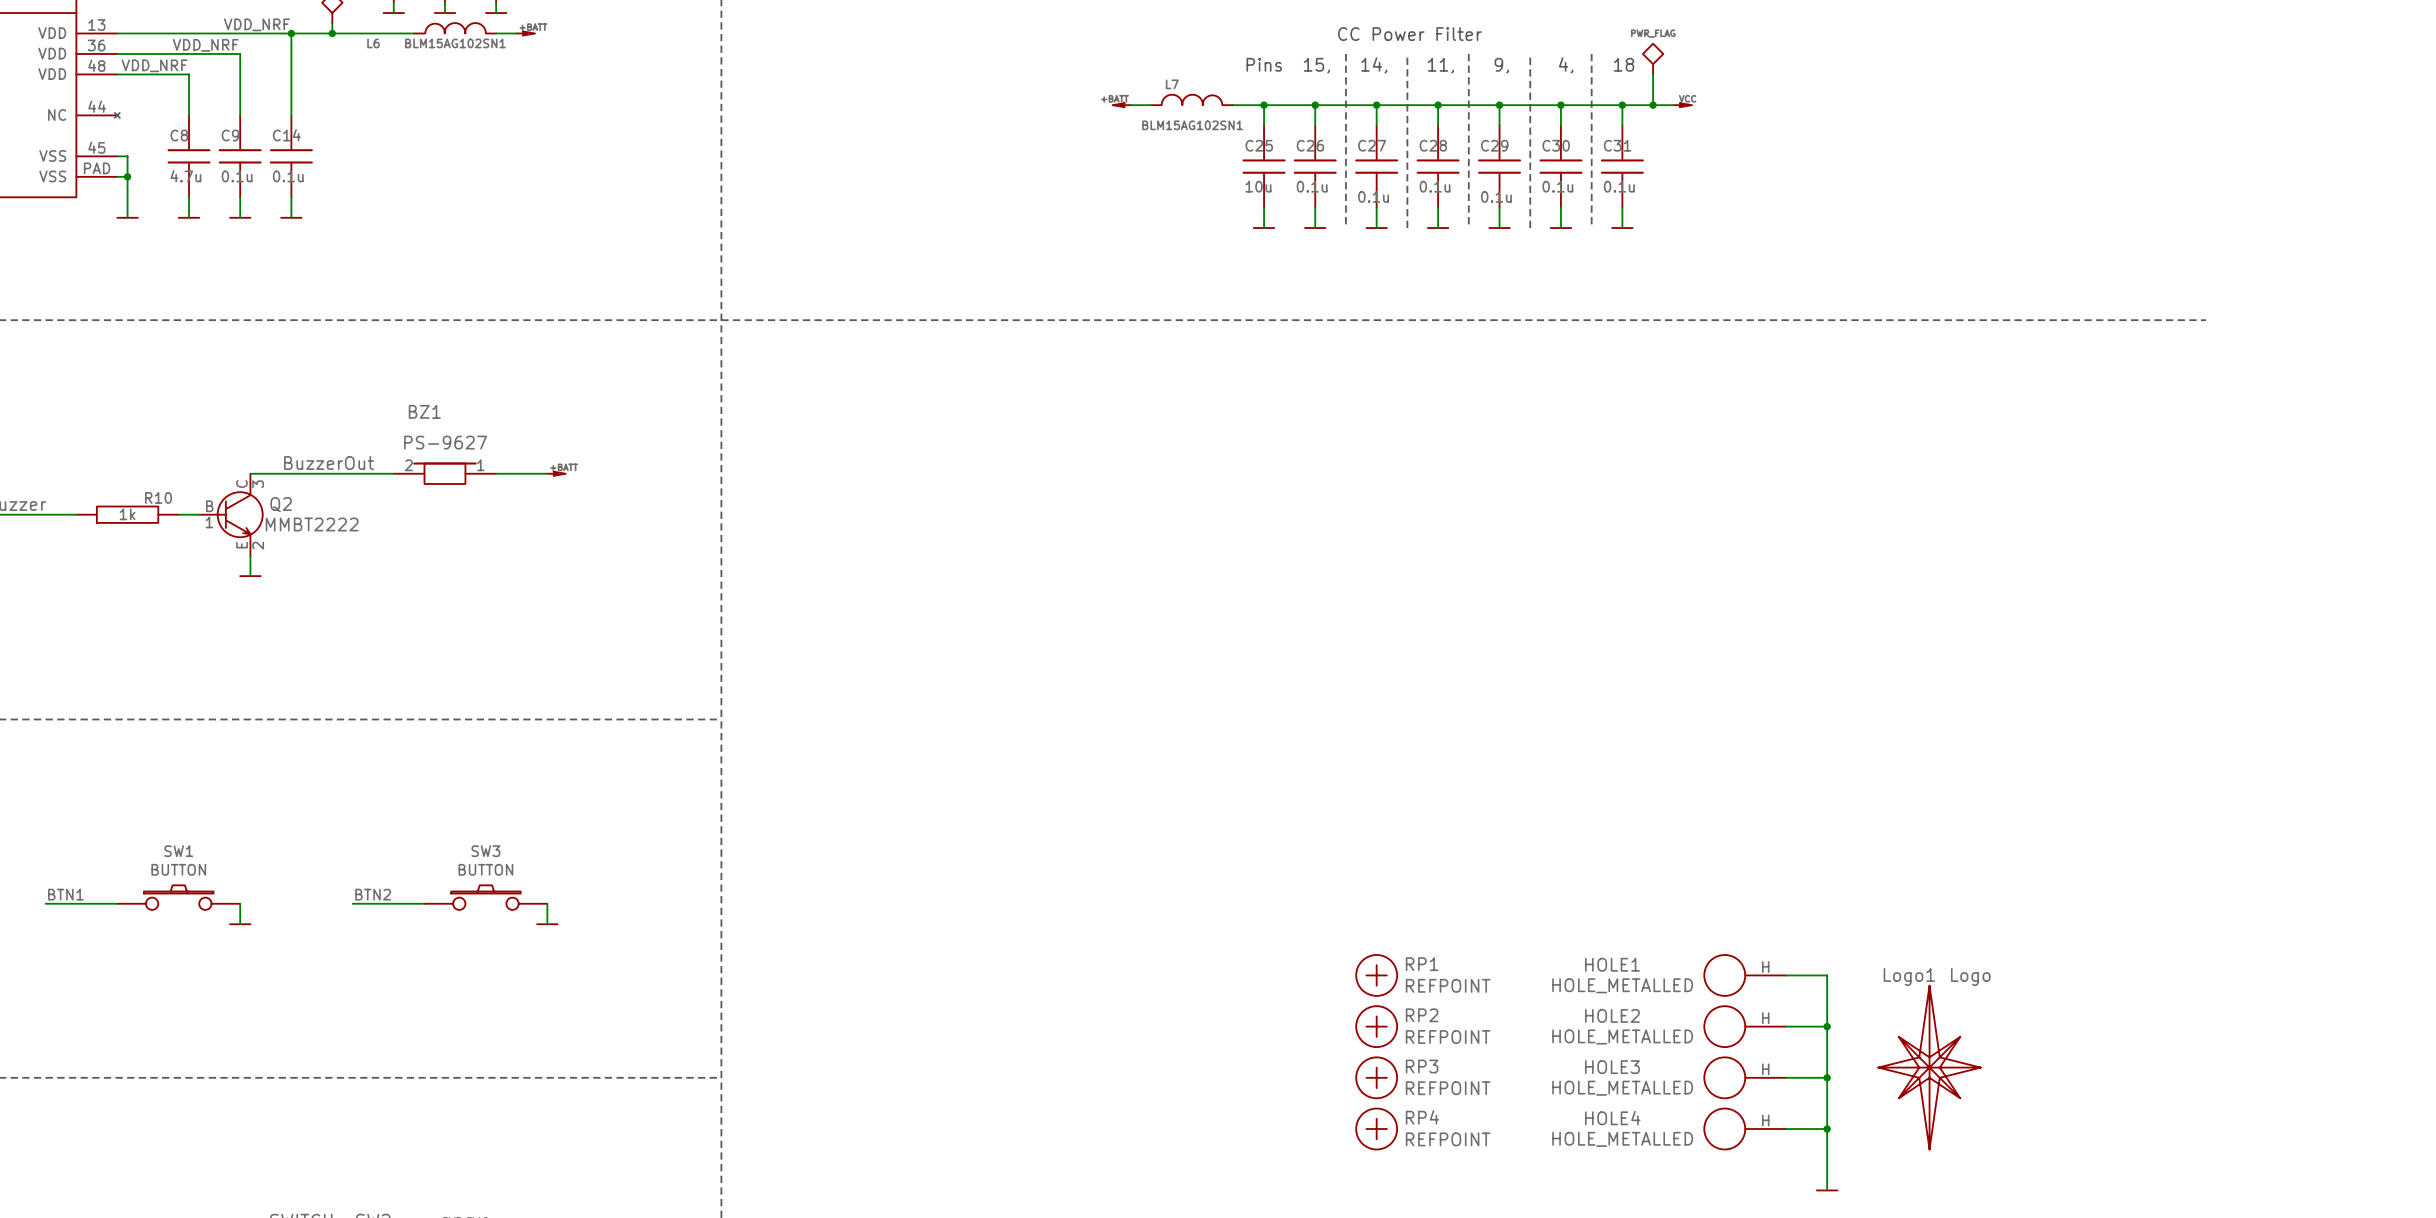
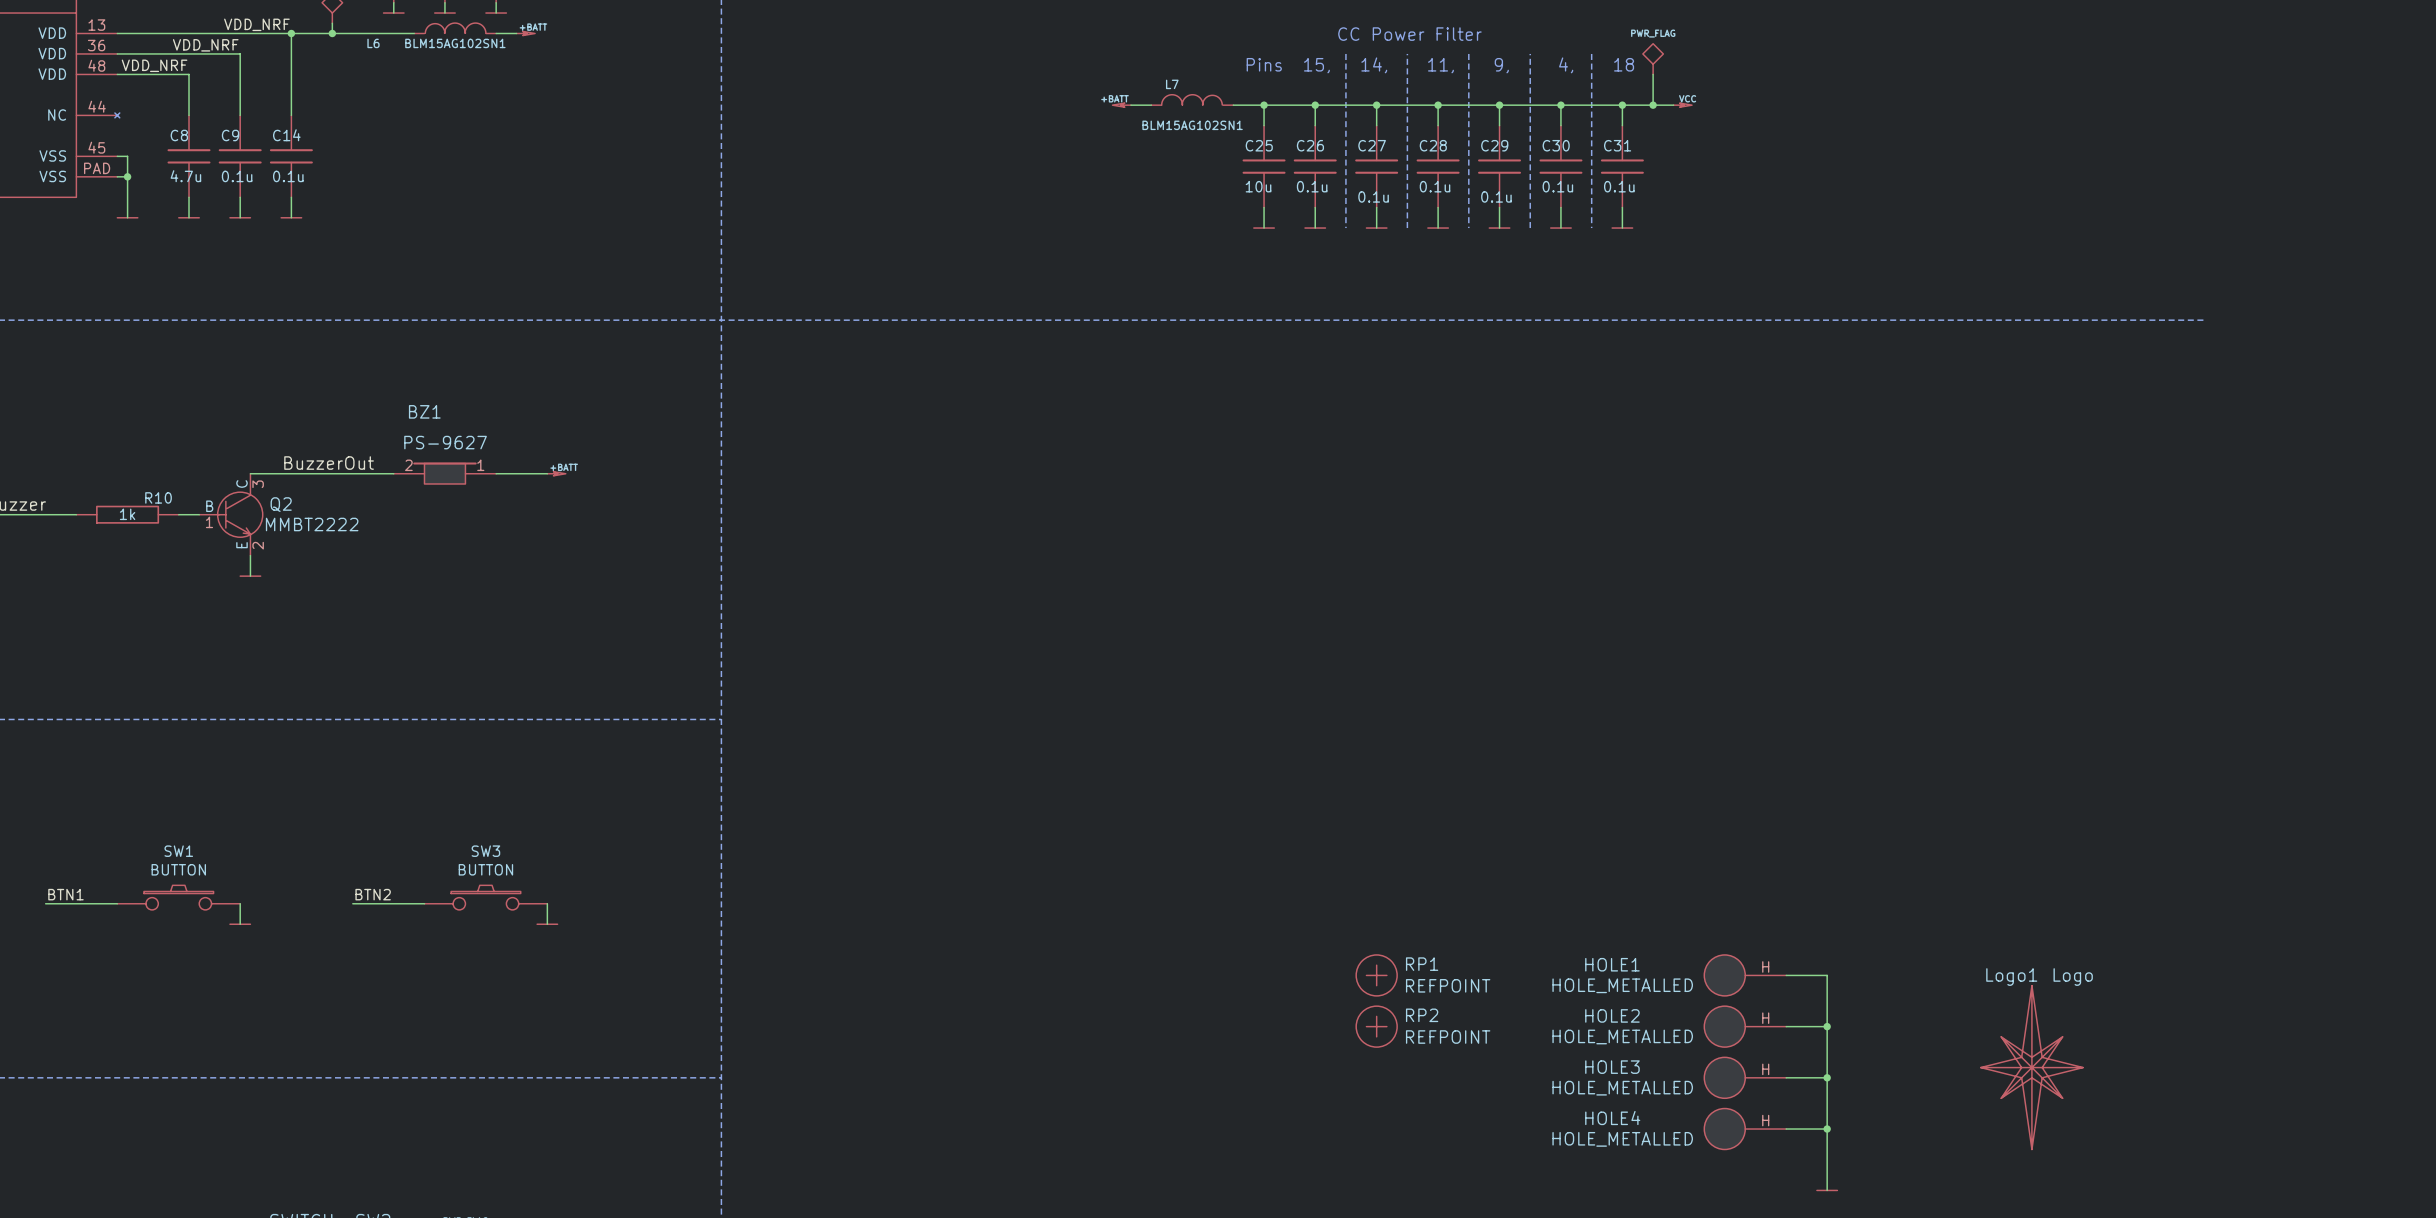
Logo1 position: (1929, 1067) -> (2031, 1067)
RP3: REFPOINT (1376, 1077) -> none
RP4: REFPOINT (1376, 1129) -> none

